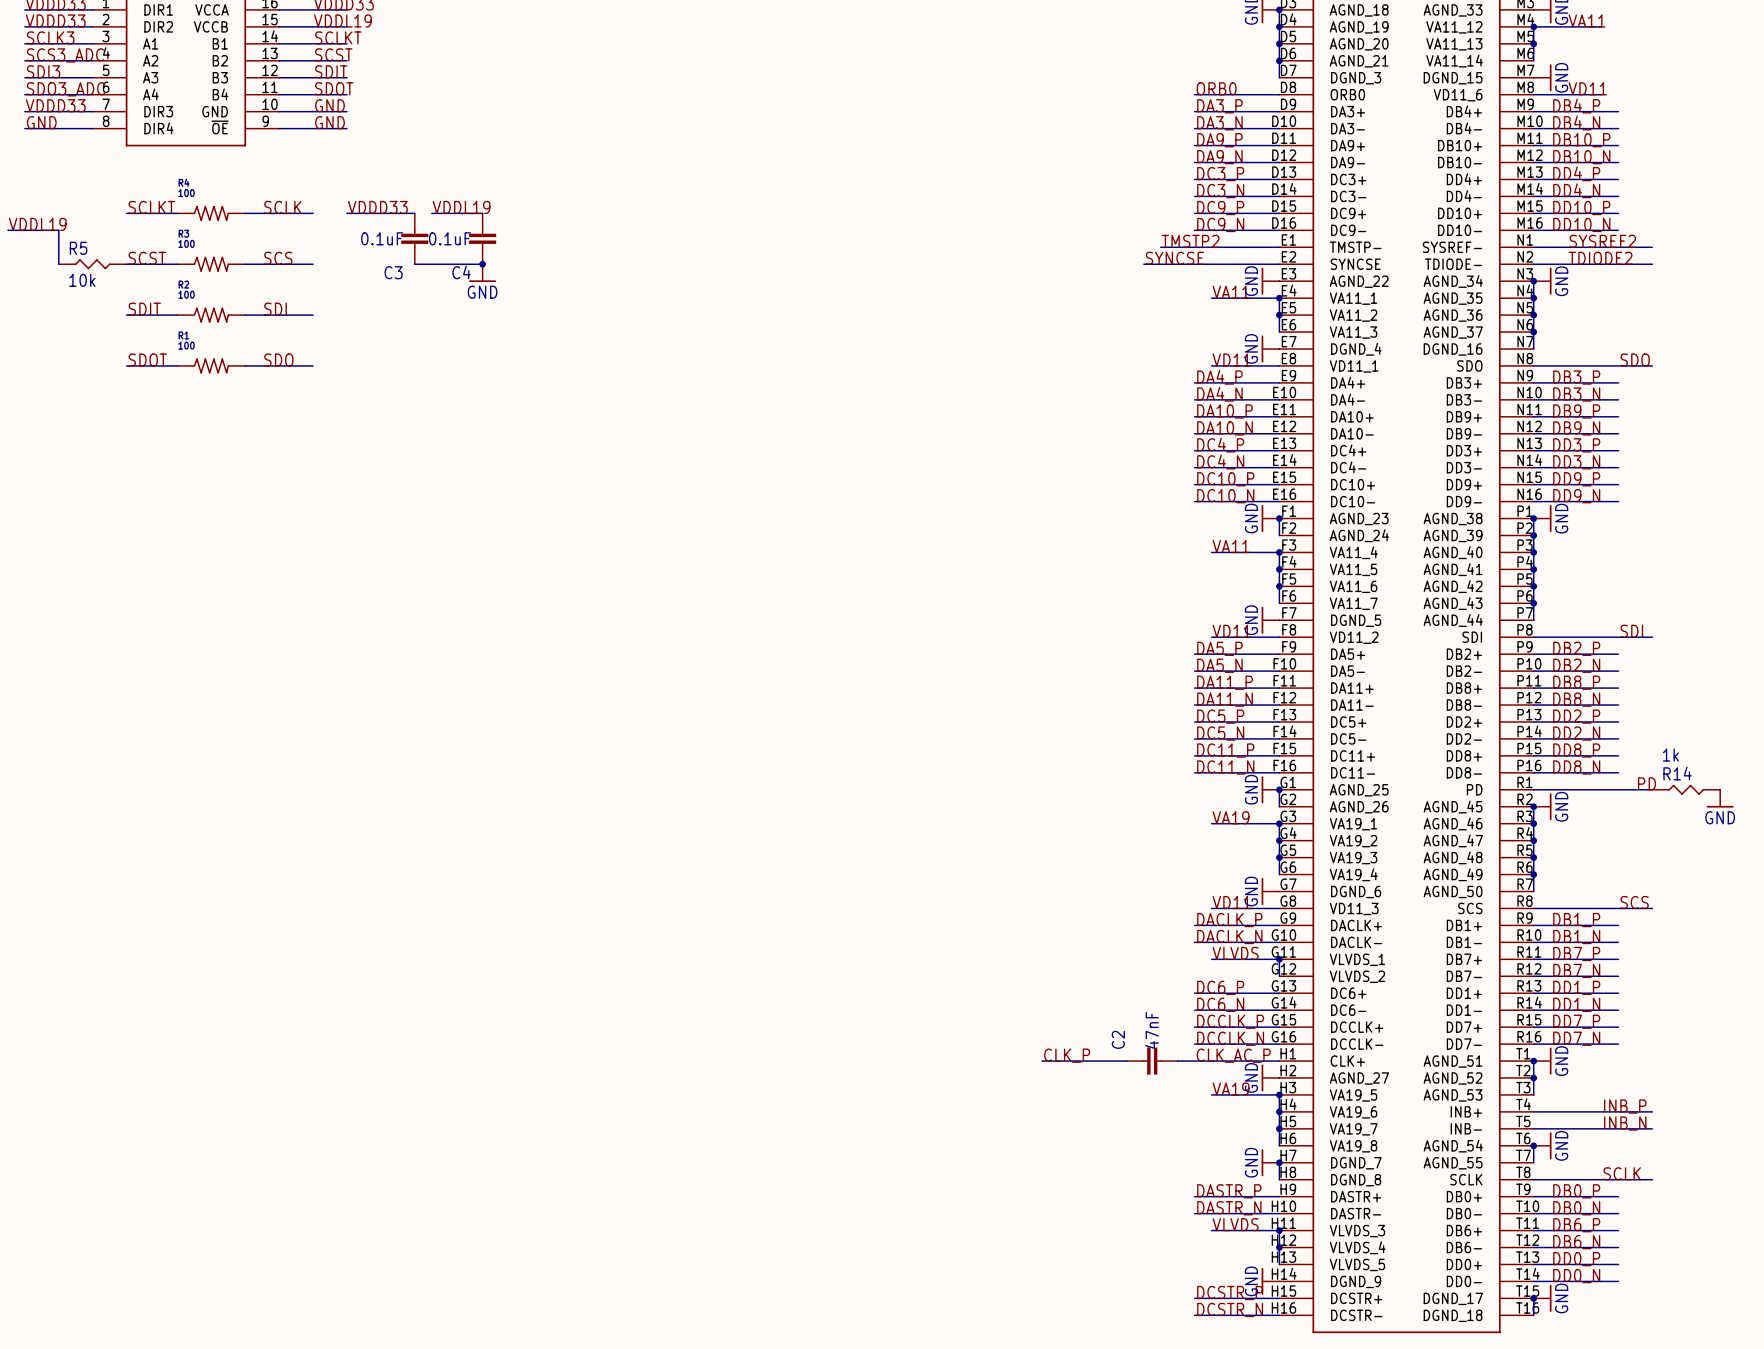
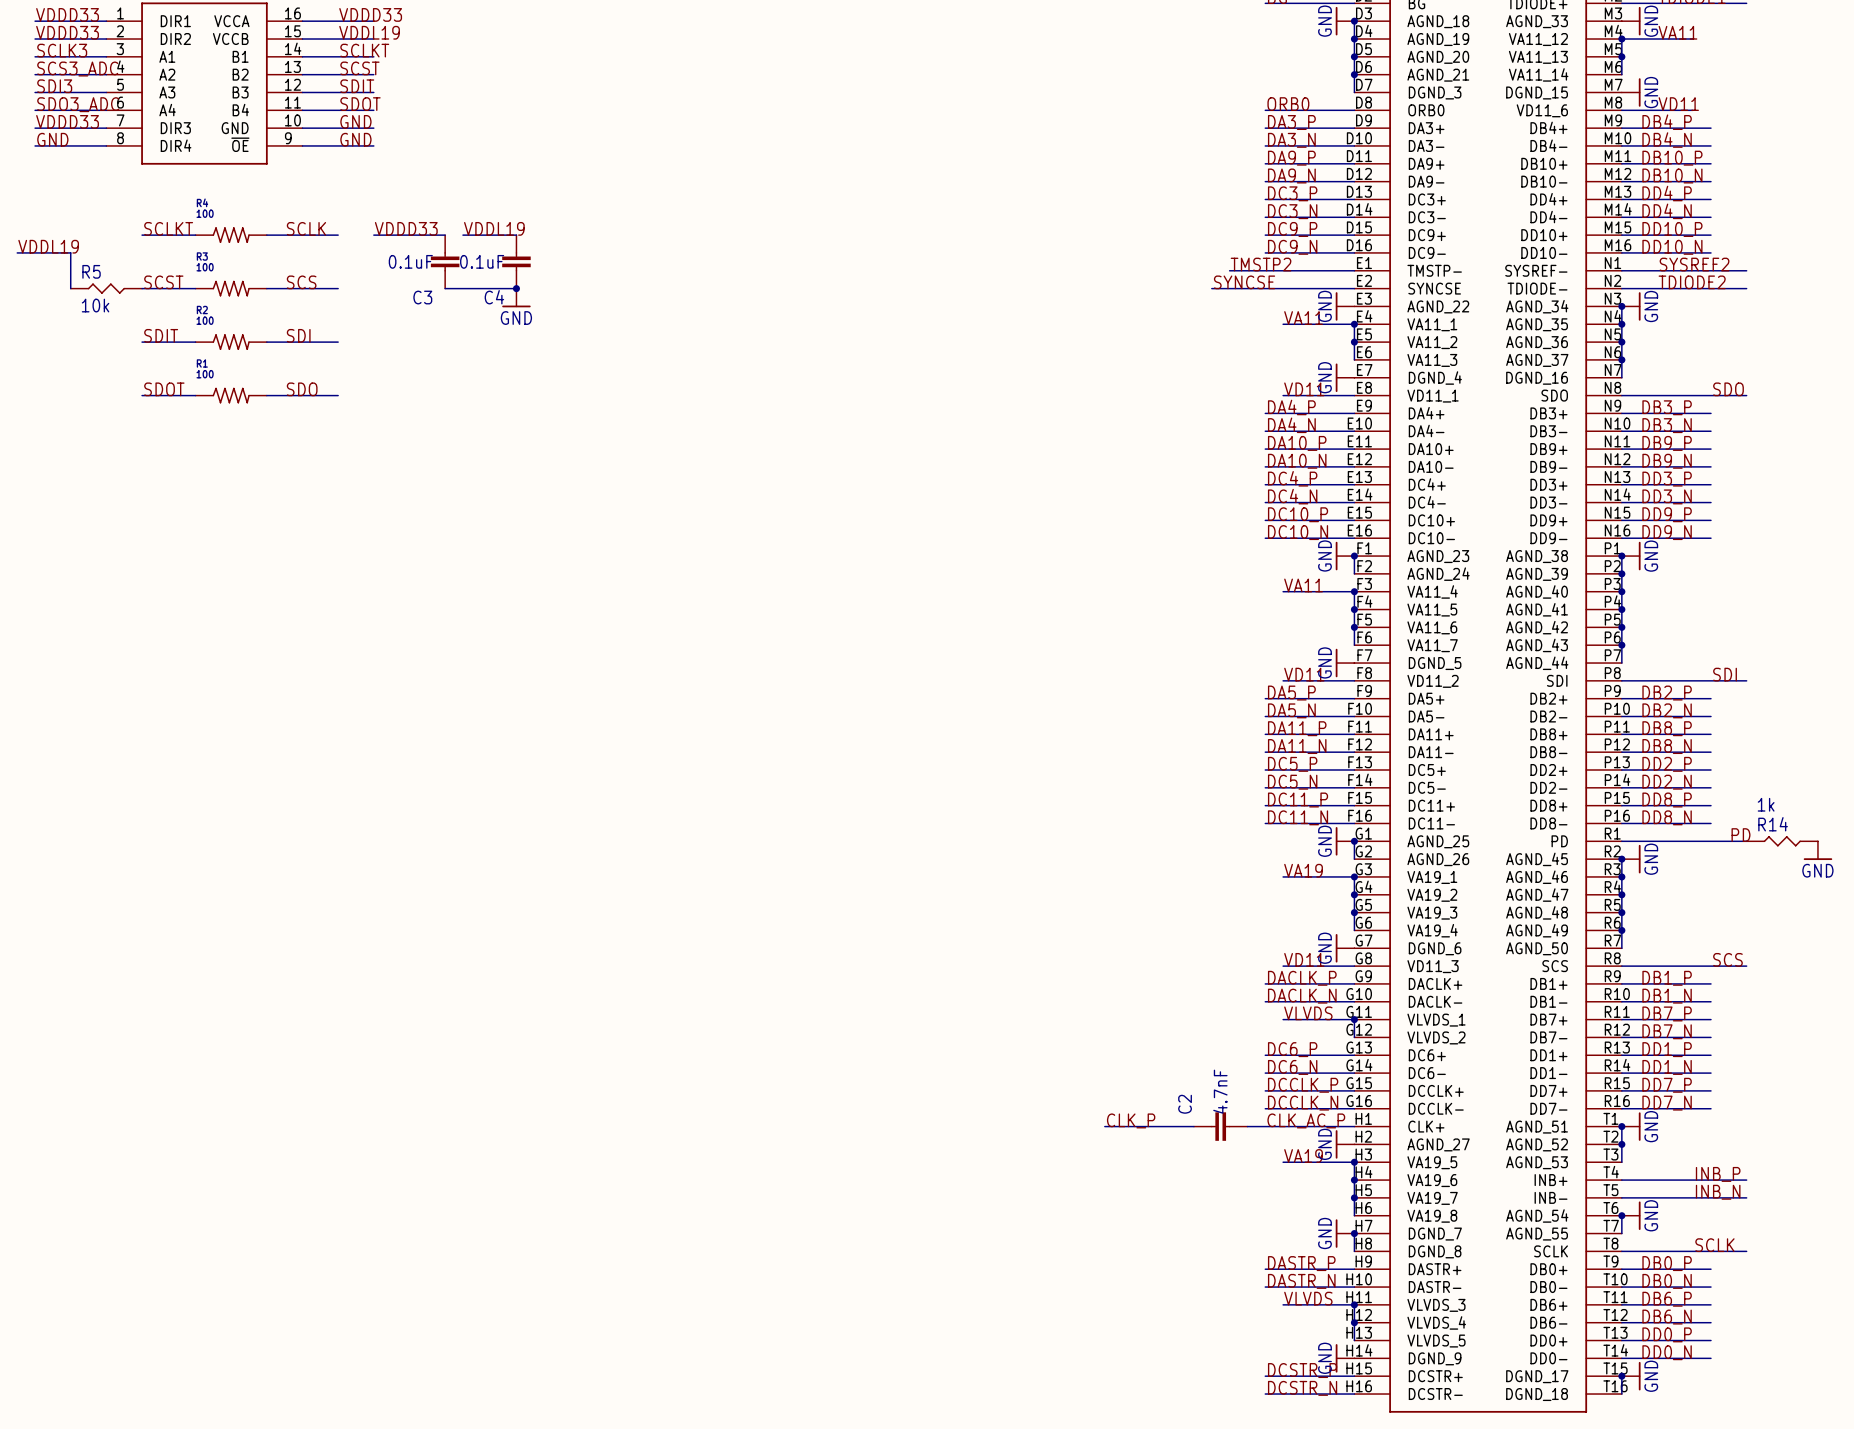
C2 value: 47nF (1151, 1030) -> 4.7nF (1220, 1091)

